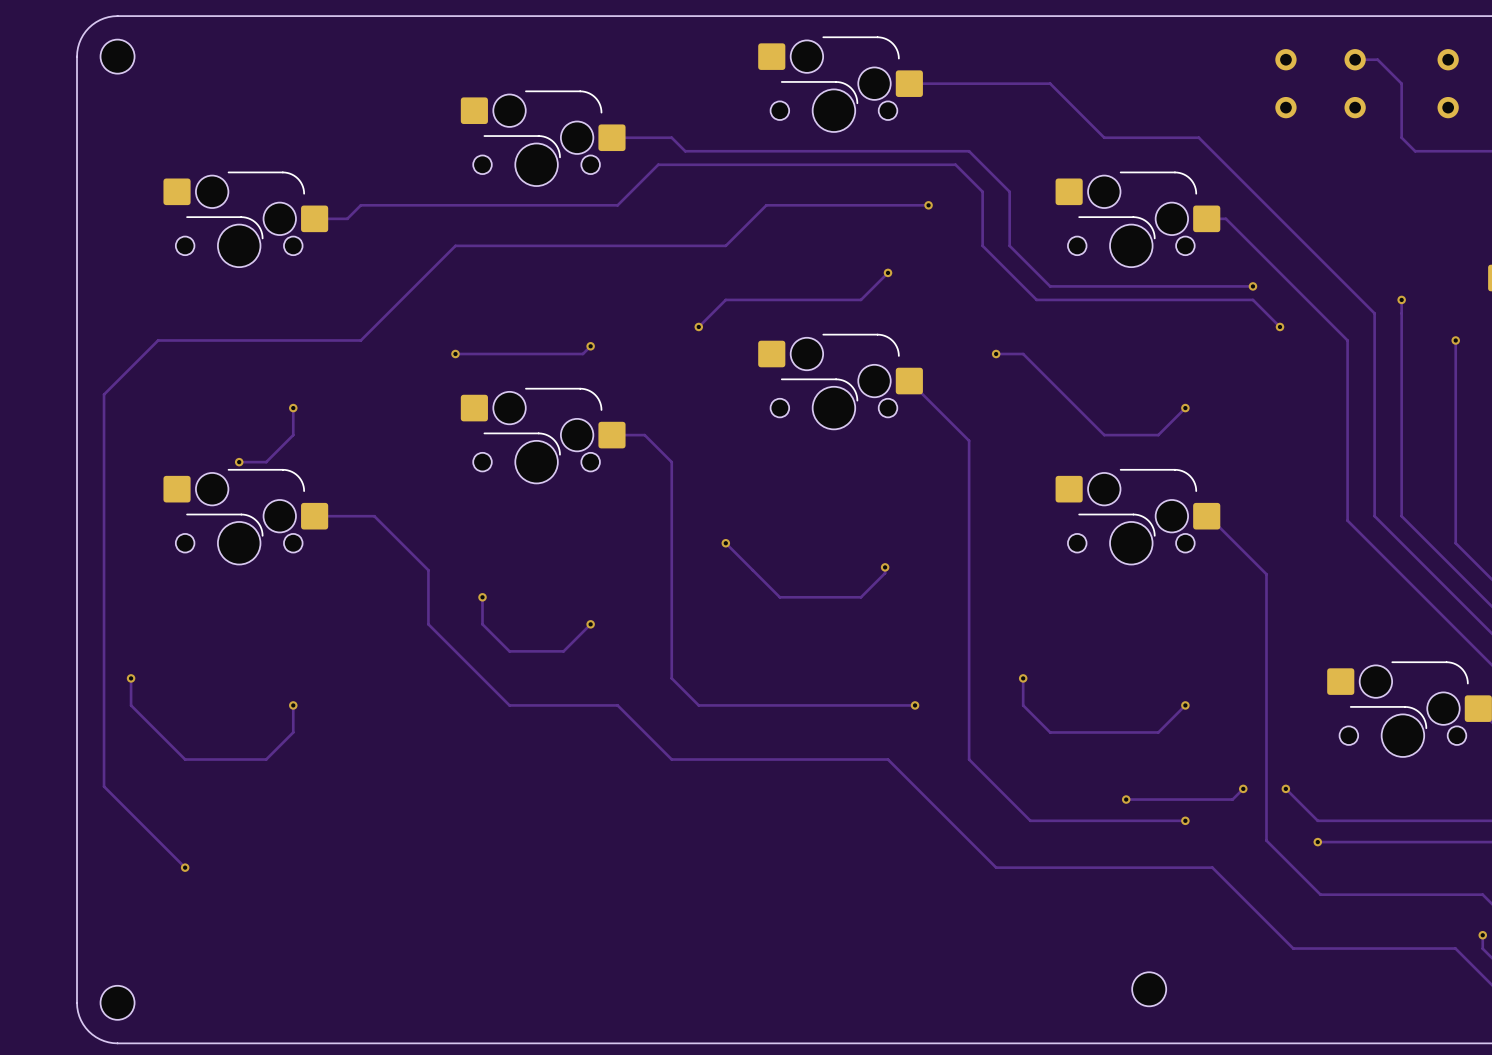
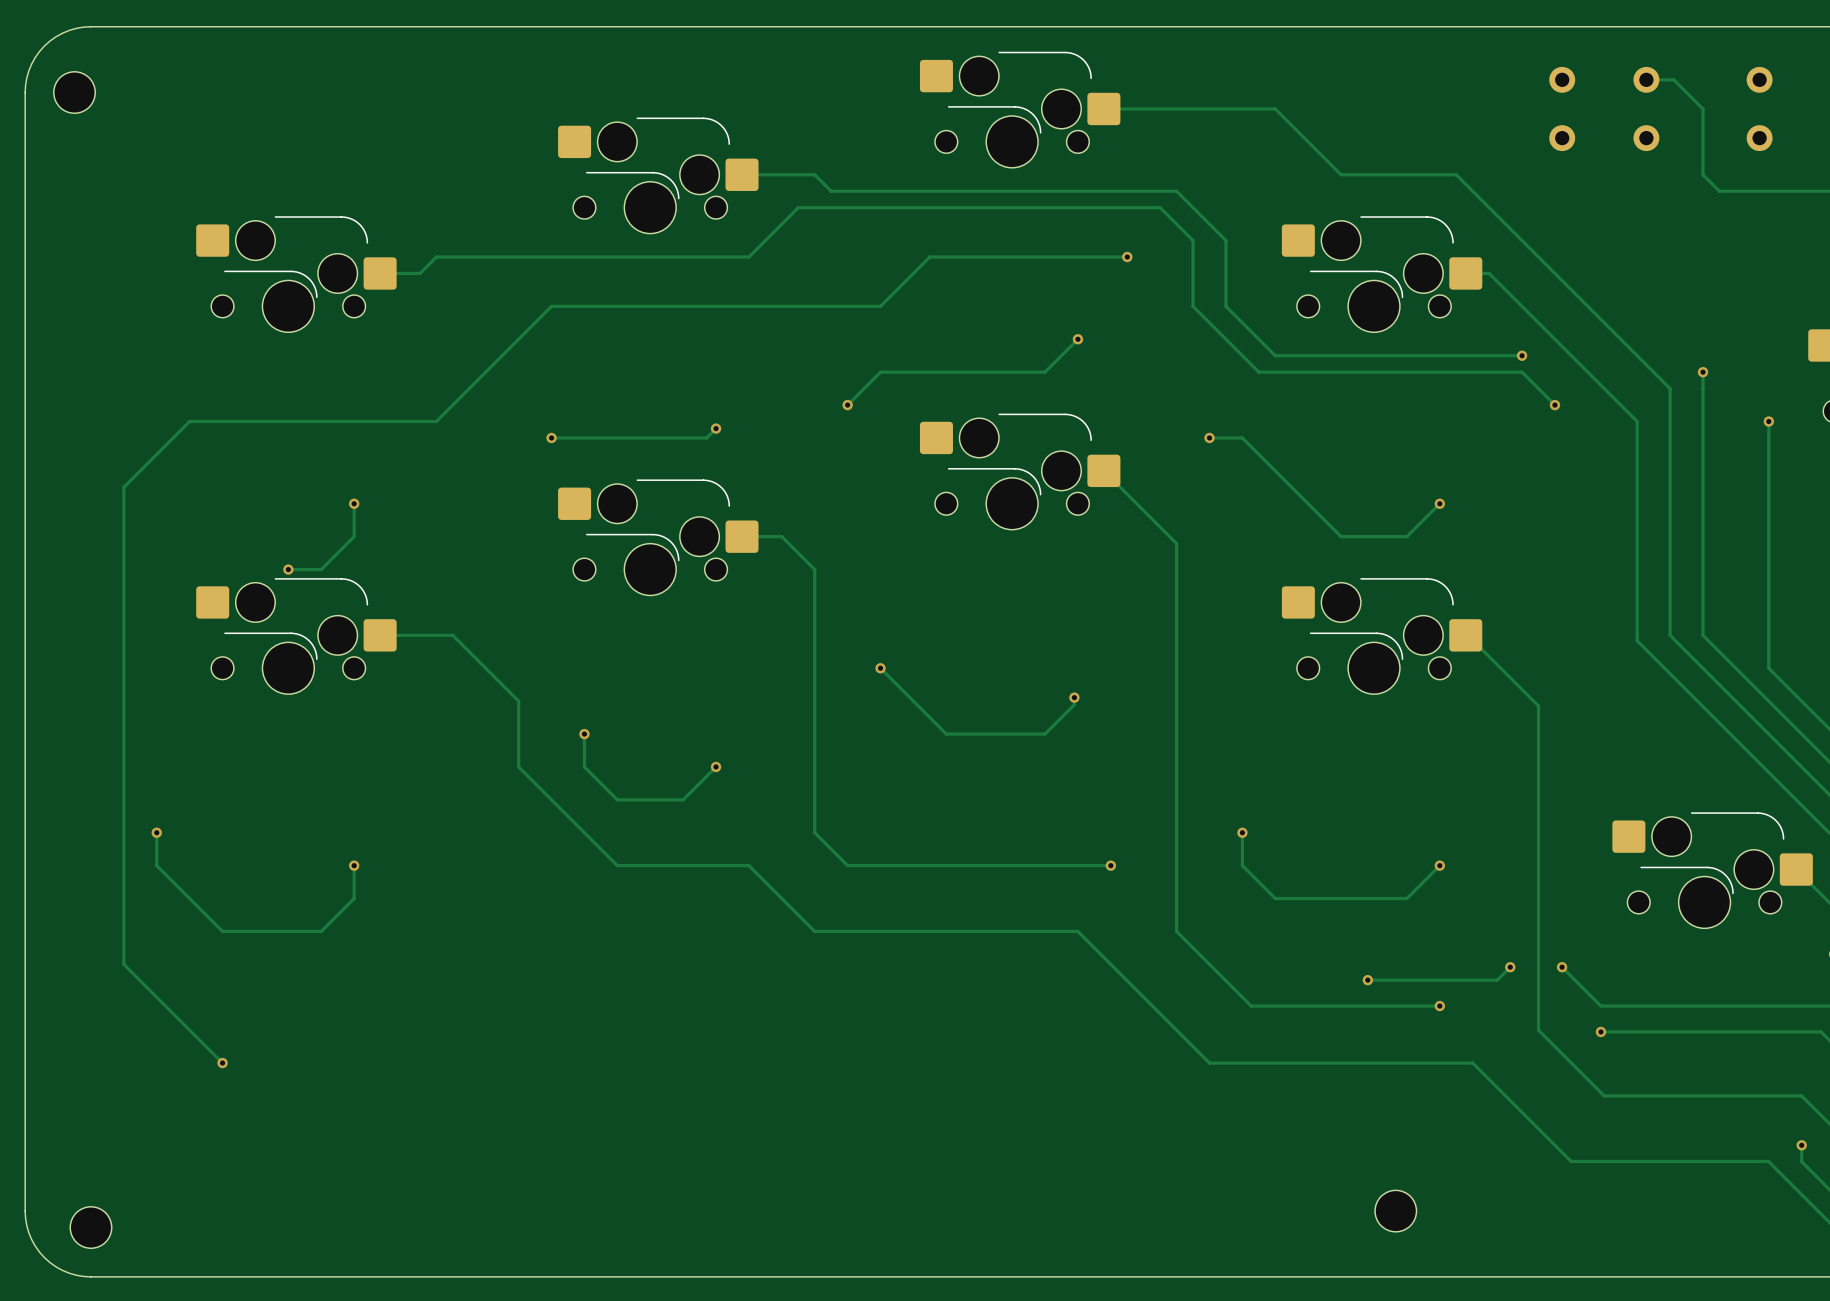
board edge: (117, 16) (104, 18) (88, 27) (81, 39) (77, 56) (77, 1002) (79, 1016) (88, 1031) (104, 1041) (117, 1043) -> (140, 26) (83, 27) (69, 30) (55, 36) (39, 51) (31, 63) (26, 77) (25, 92) (25, 1218) (31, 1239) (39, 1252) (49, 1262) (62, 1270) (83, 1276) (140, 1276)
part position: (117, 56) -> (74, 92)
part position: (117, 1002) -> (90, 1227)

